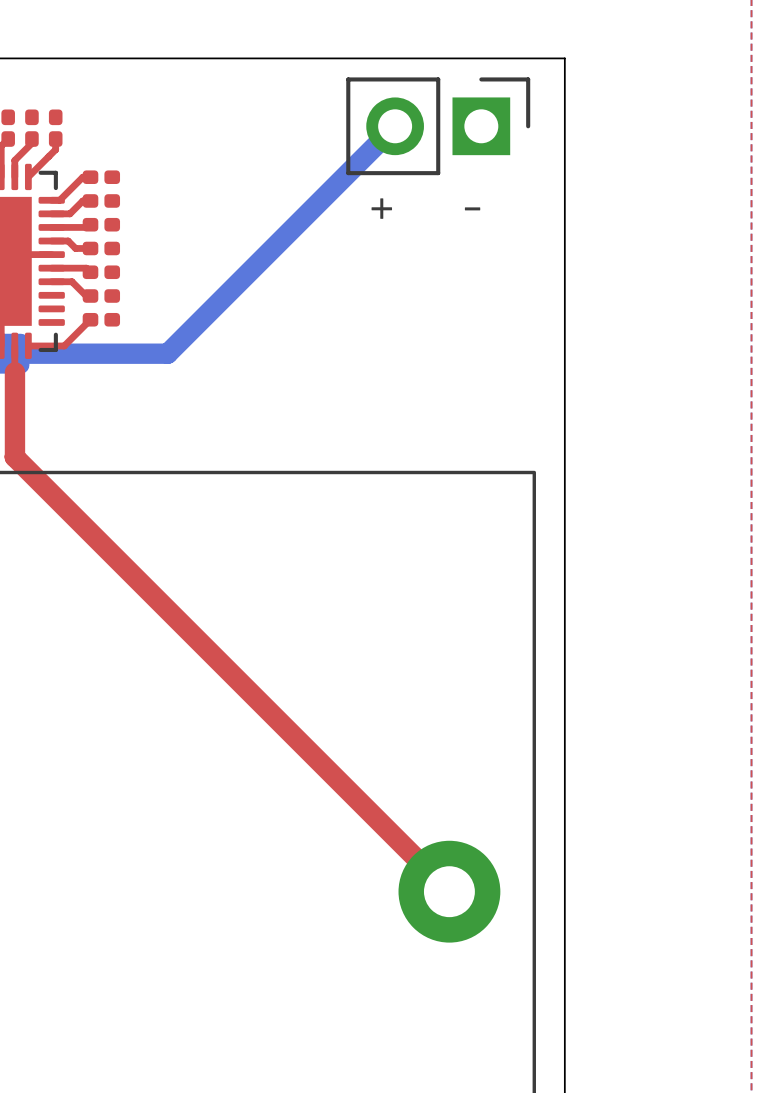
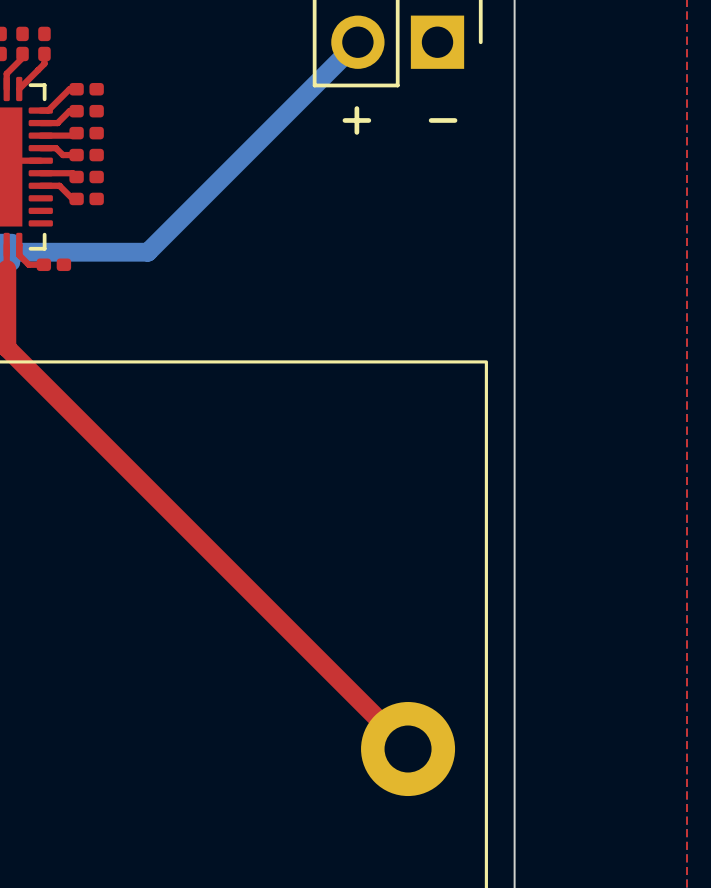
top track: (90, 319) (64, 345) (28, 345) -> (43, 264) (28, 264) (19, 255) (19, 245)
part position: (101, 319) -> (53, 264)

